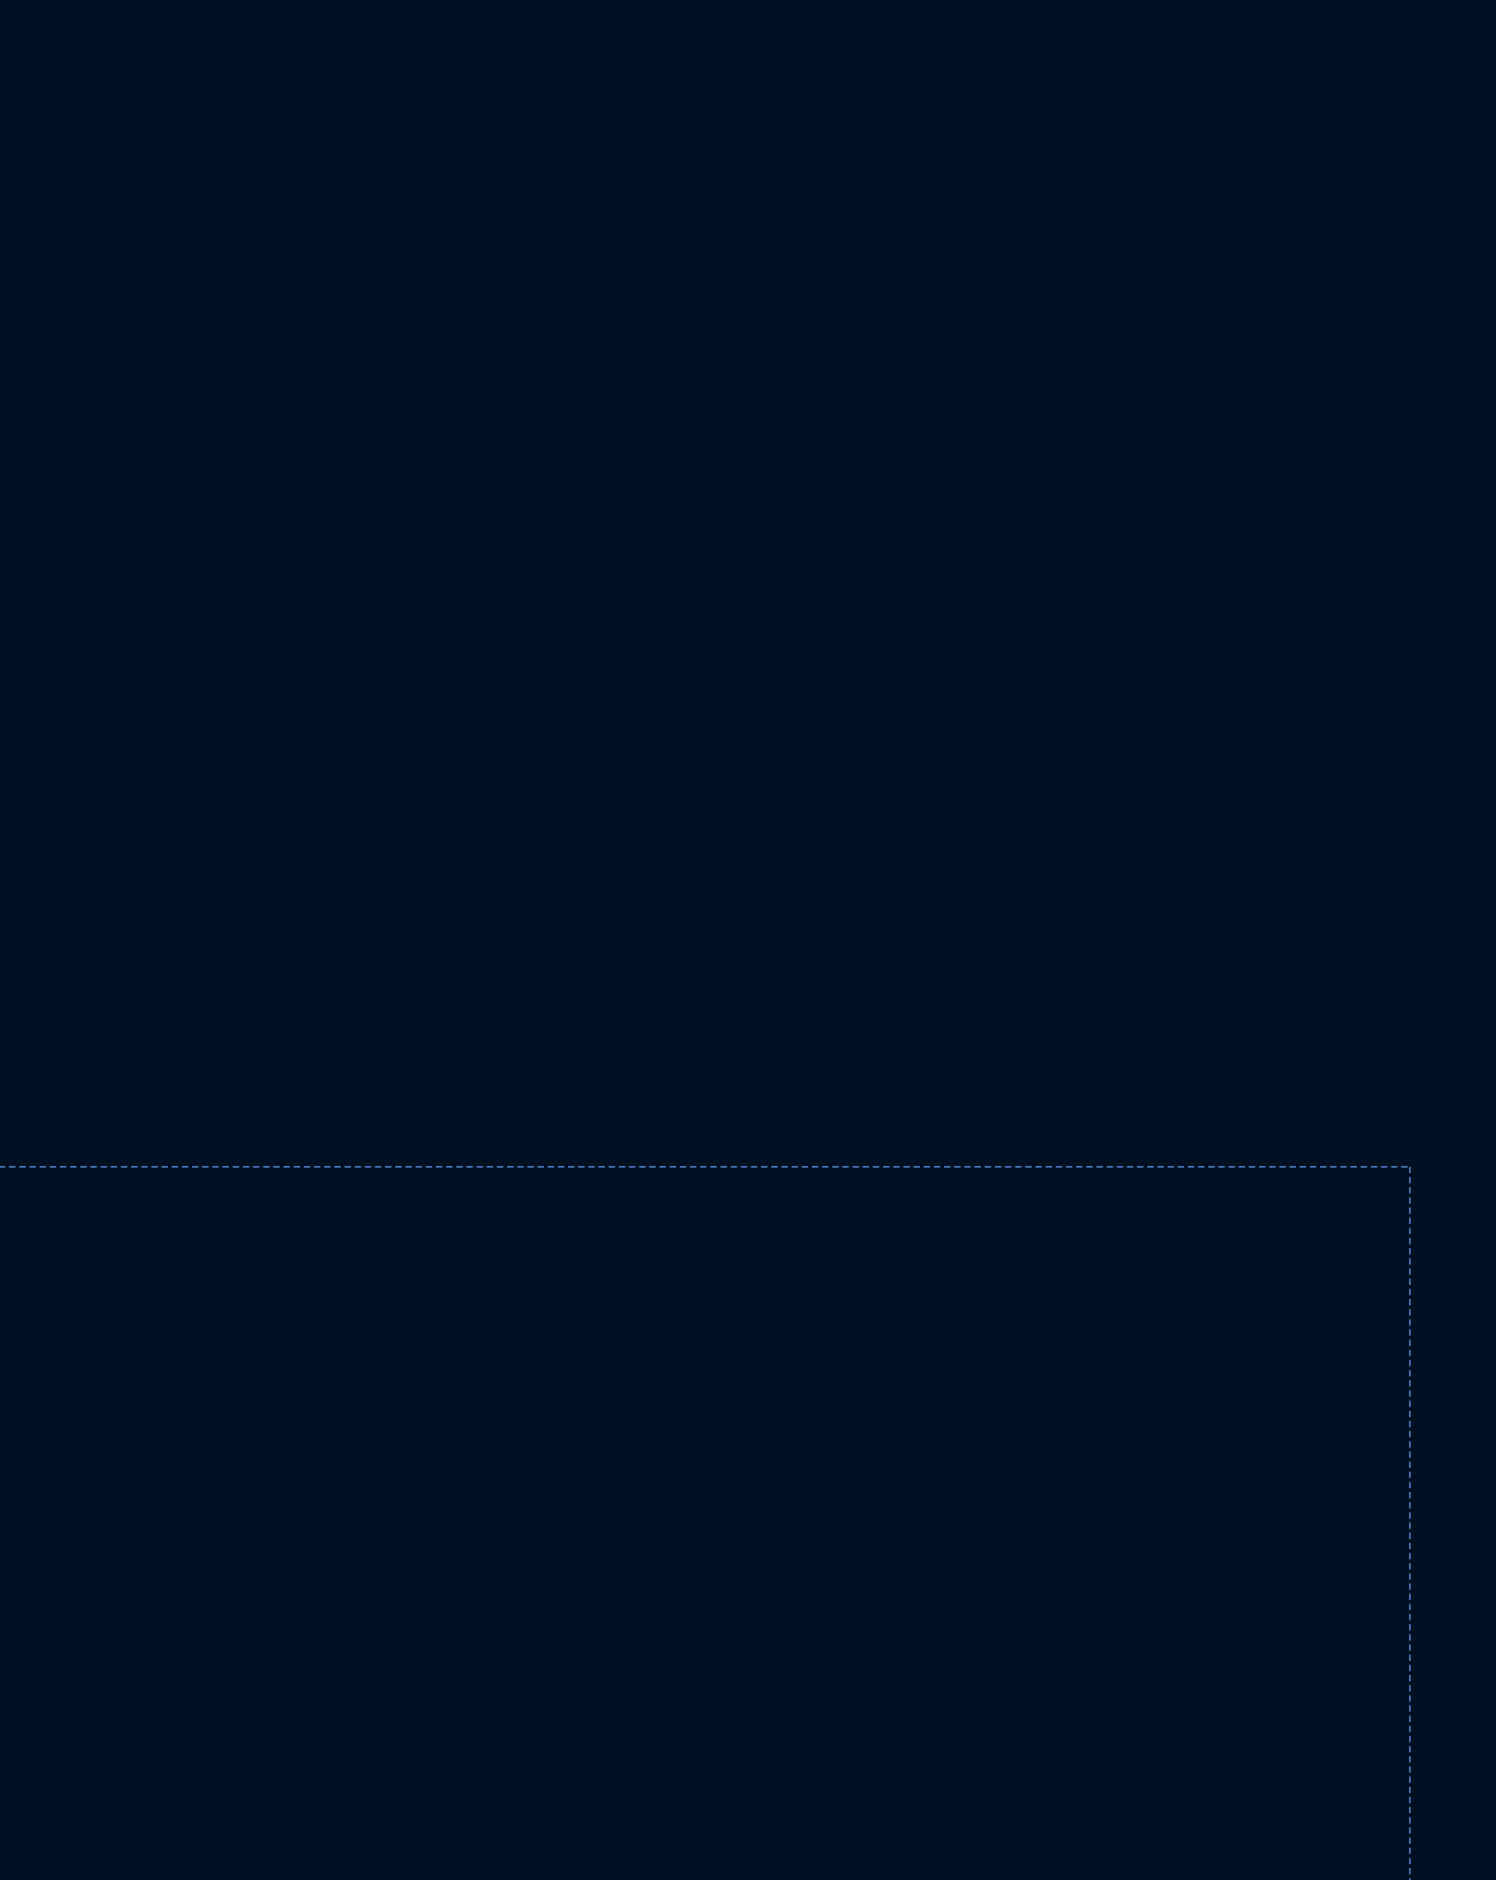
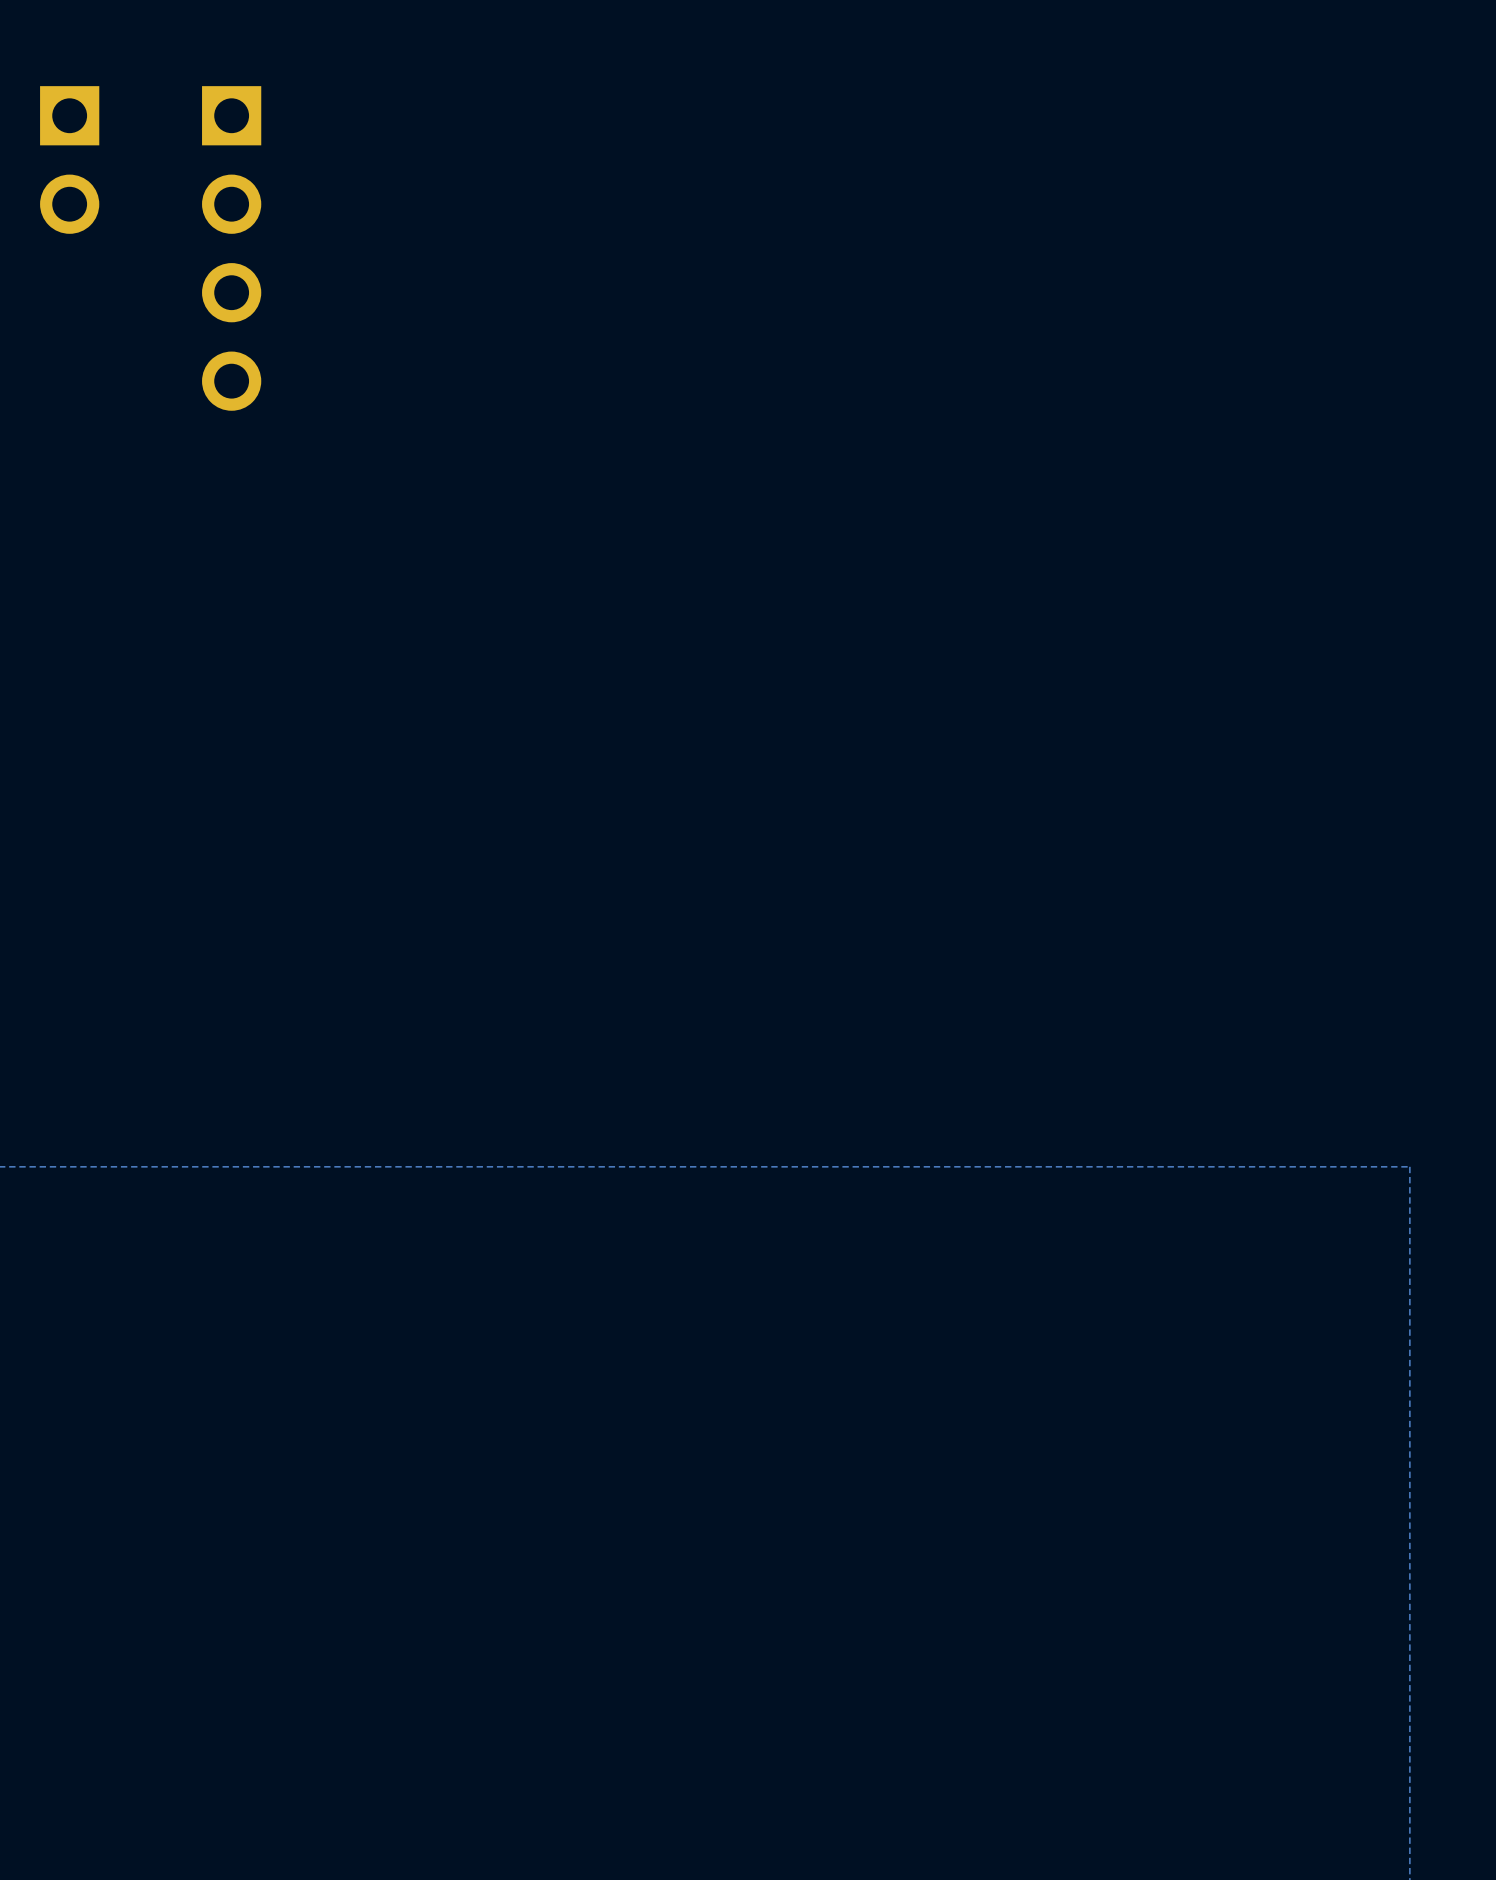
part: none -> (69, 159)
part: none -> (231, 248)

